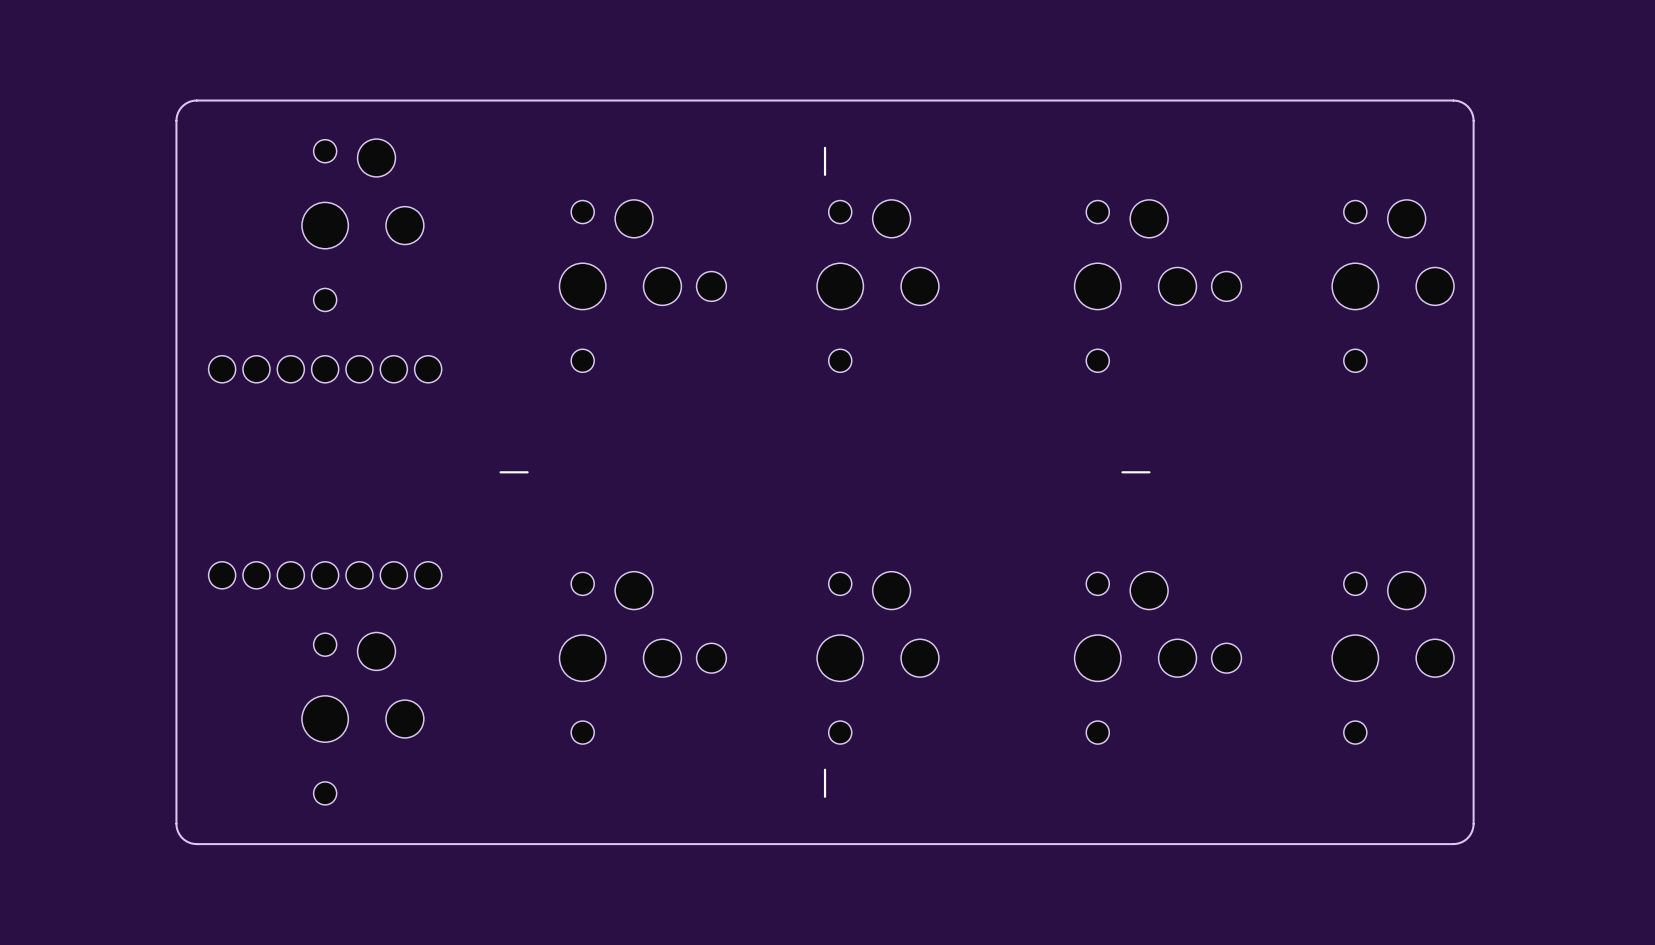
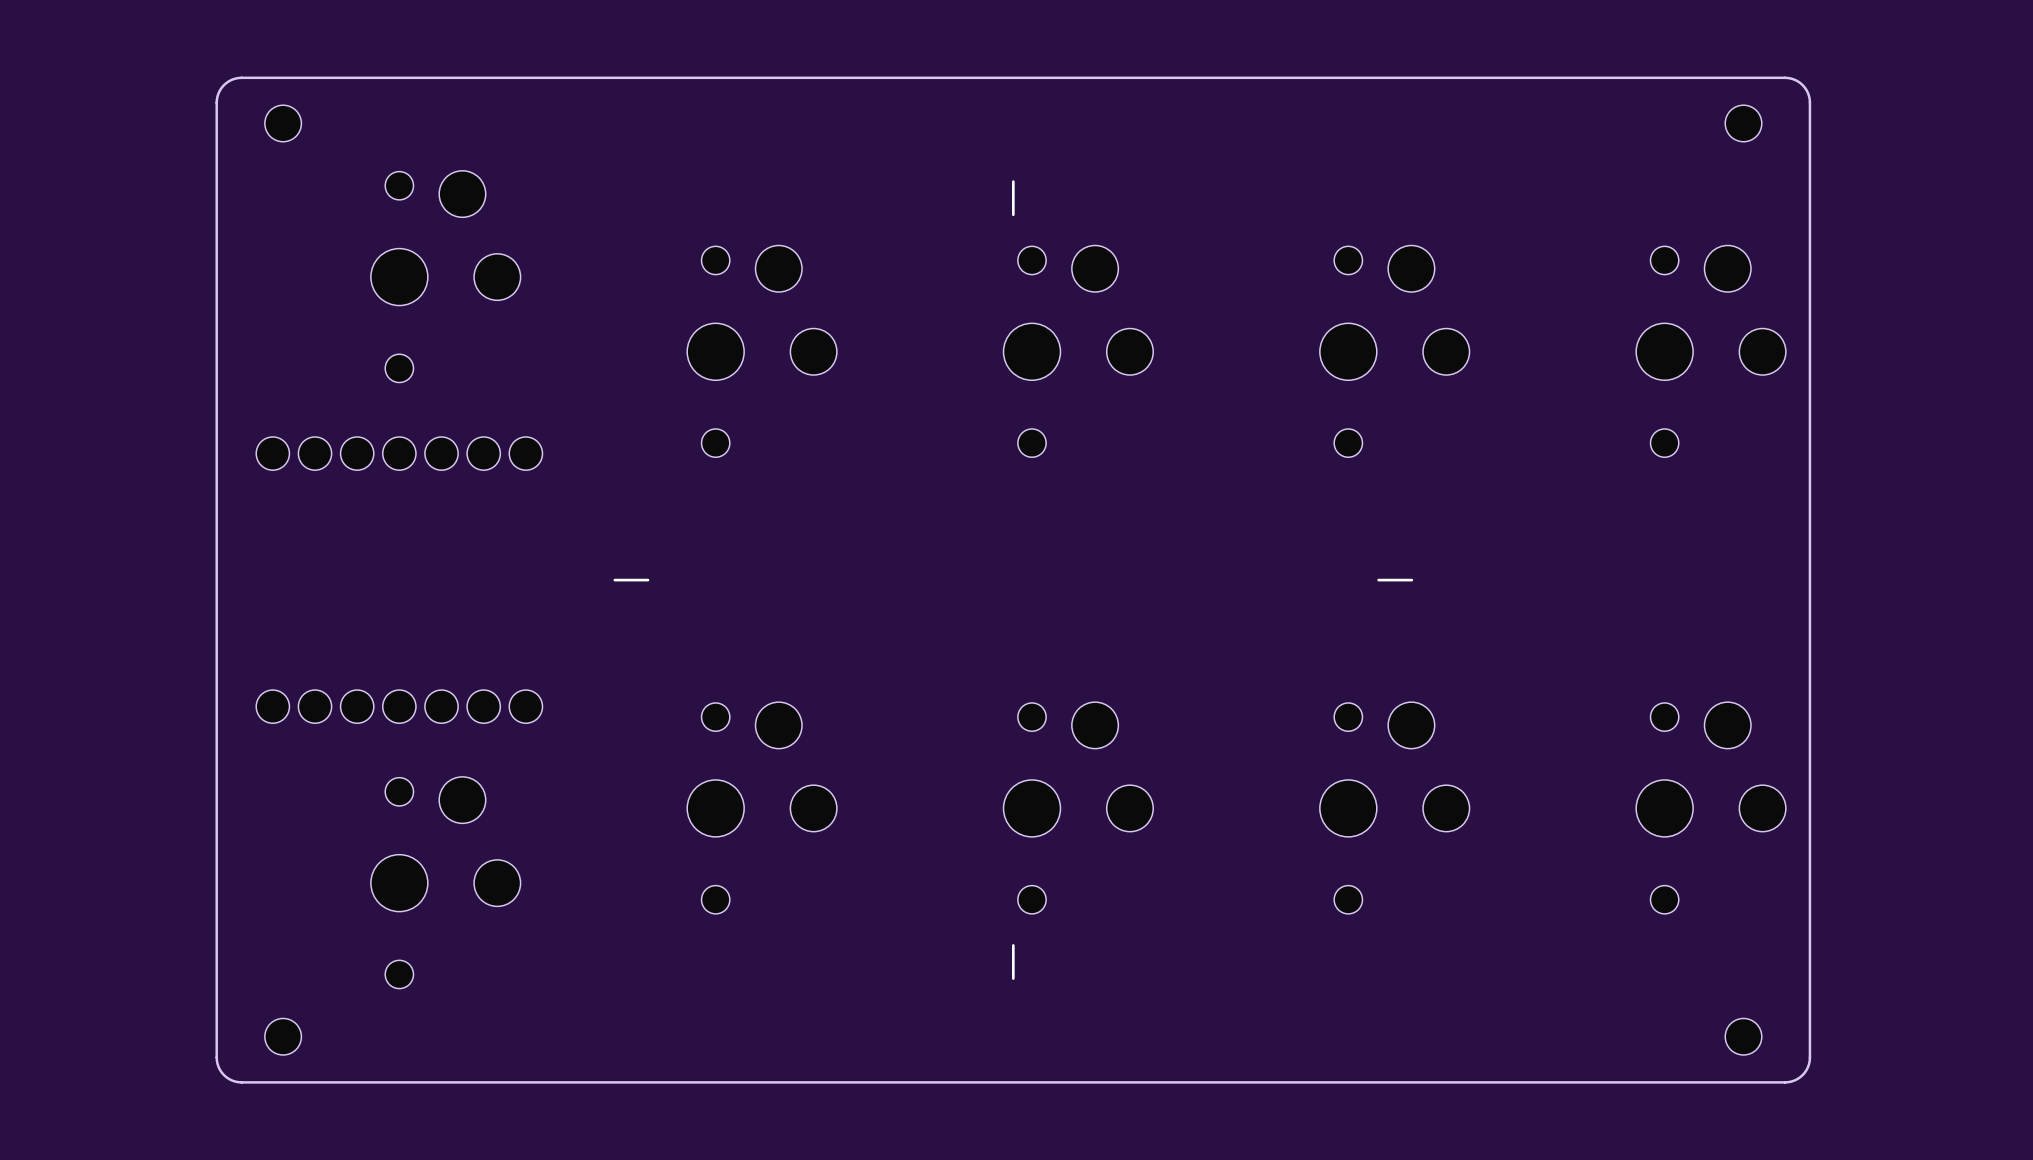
part: none -> (283, 123)
board edge: (1473, 120) (1472, 113) (1467, 106) (1461, 102) (1453, 100) (196, 100) (188, 102) (182, 106) (177, 113) (176, 120) -> (1809, 148) (1809, 102) (1808, 93) (1797, 81) (1785, 77) (241, 77) (229, 81) (218, 93) (216, 102) (216, 148)
part: (711, 286) -> none
part position: (1226, 286) -> (1743, 123)
part: (711, 658) -> none
part position: (1226, 658) -> (1743, 1036)
board edge: (1473, 823) (1472, 831) (1467, 838) (1461, 842) (1453, 844) (196, 844) (188, 842) (182, 838) (177, 831) (176, 823) -> (1809, 1011) (1809, 1057) (1808, 1067) (1797, 1079) (1785, 1082) (241, 1082) (229, 1079) (218, 1067) (216, 1057) (216, 1011)
part: none -> (283, 1036)

